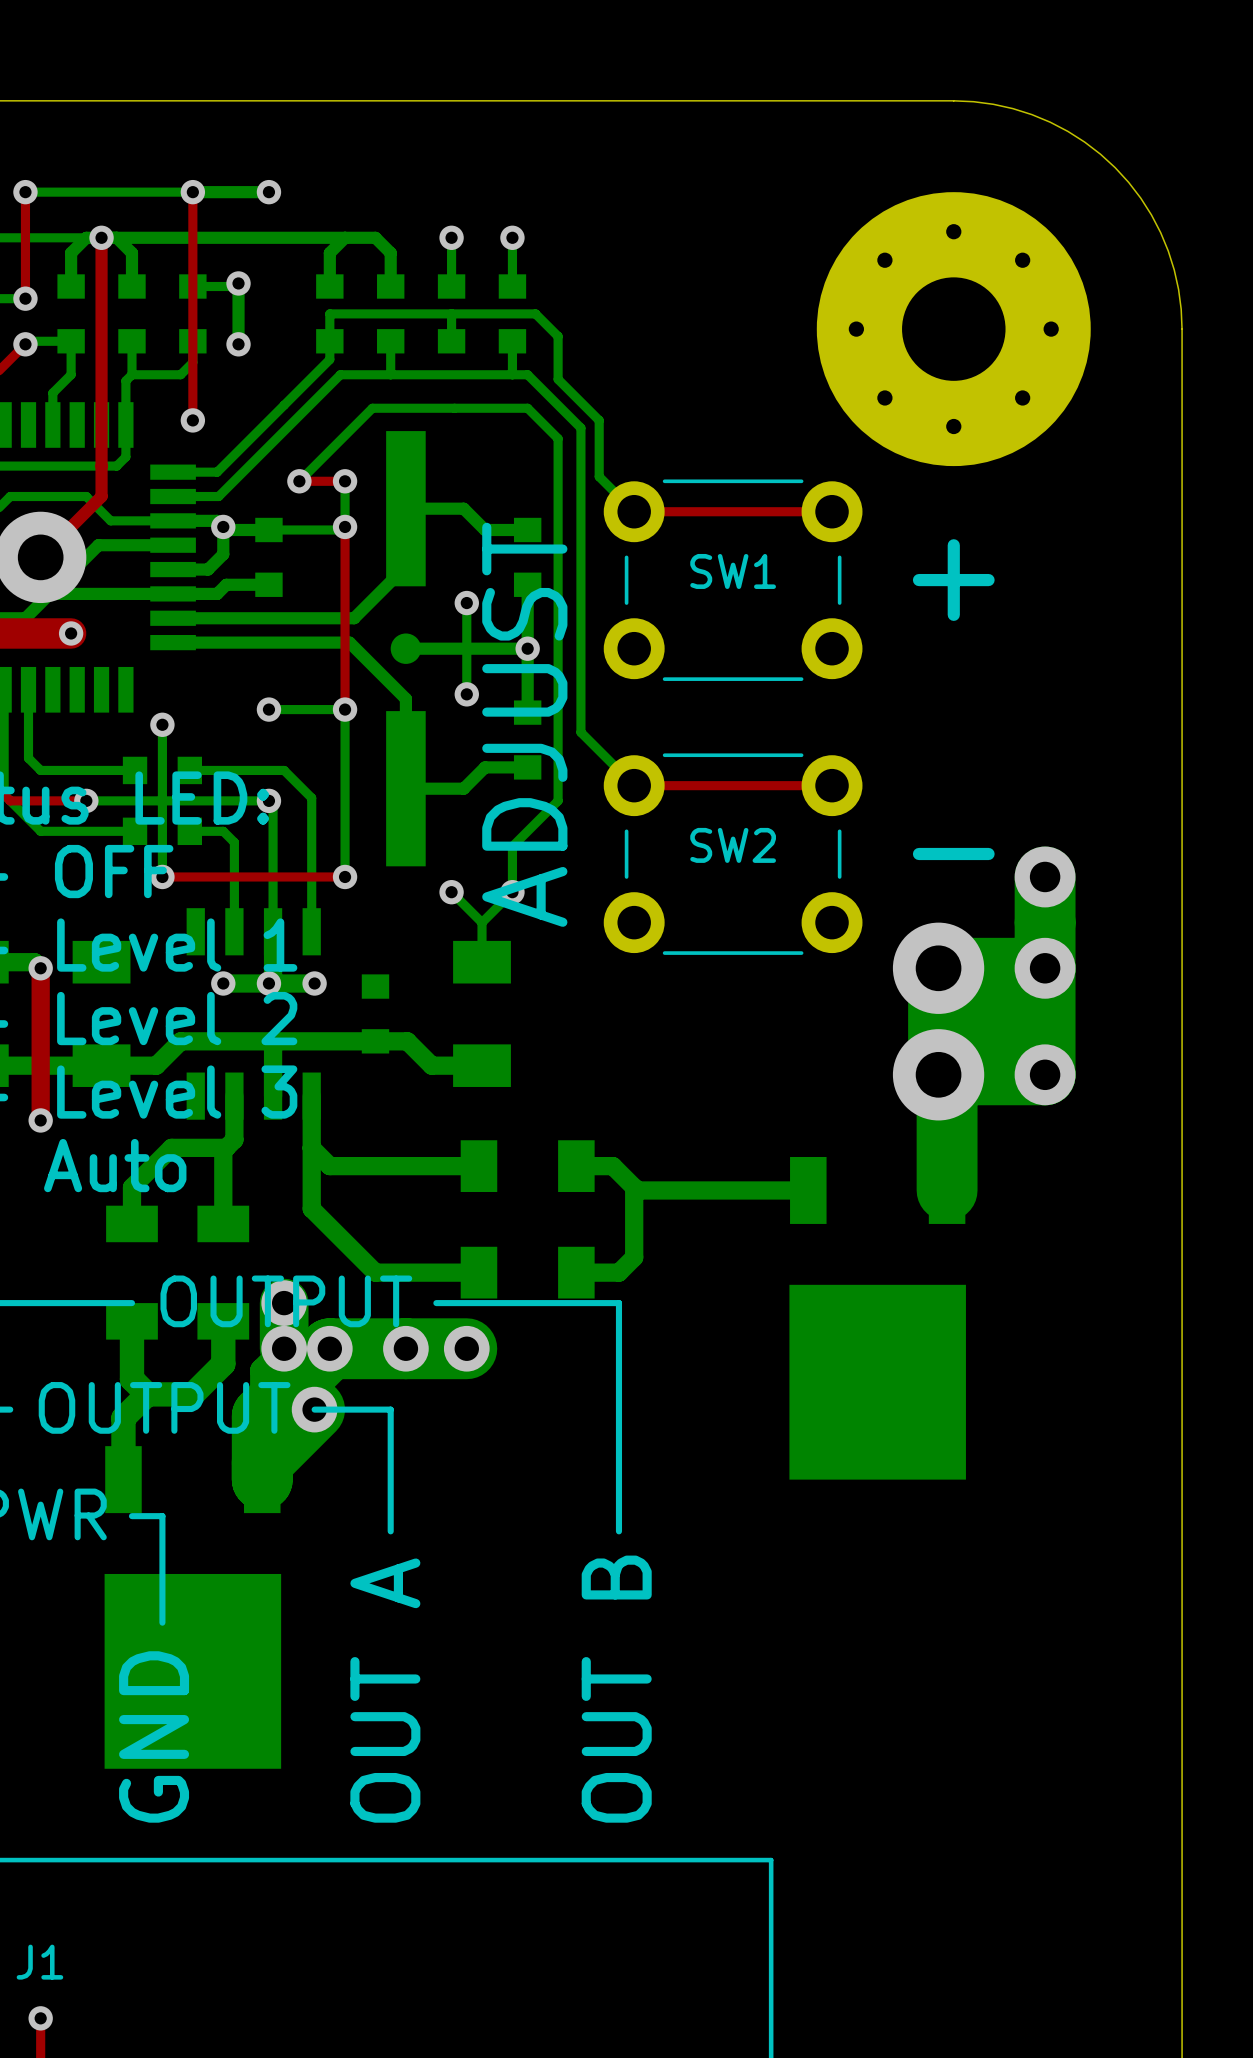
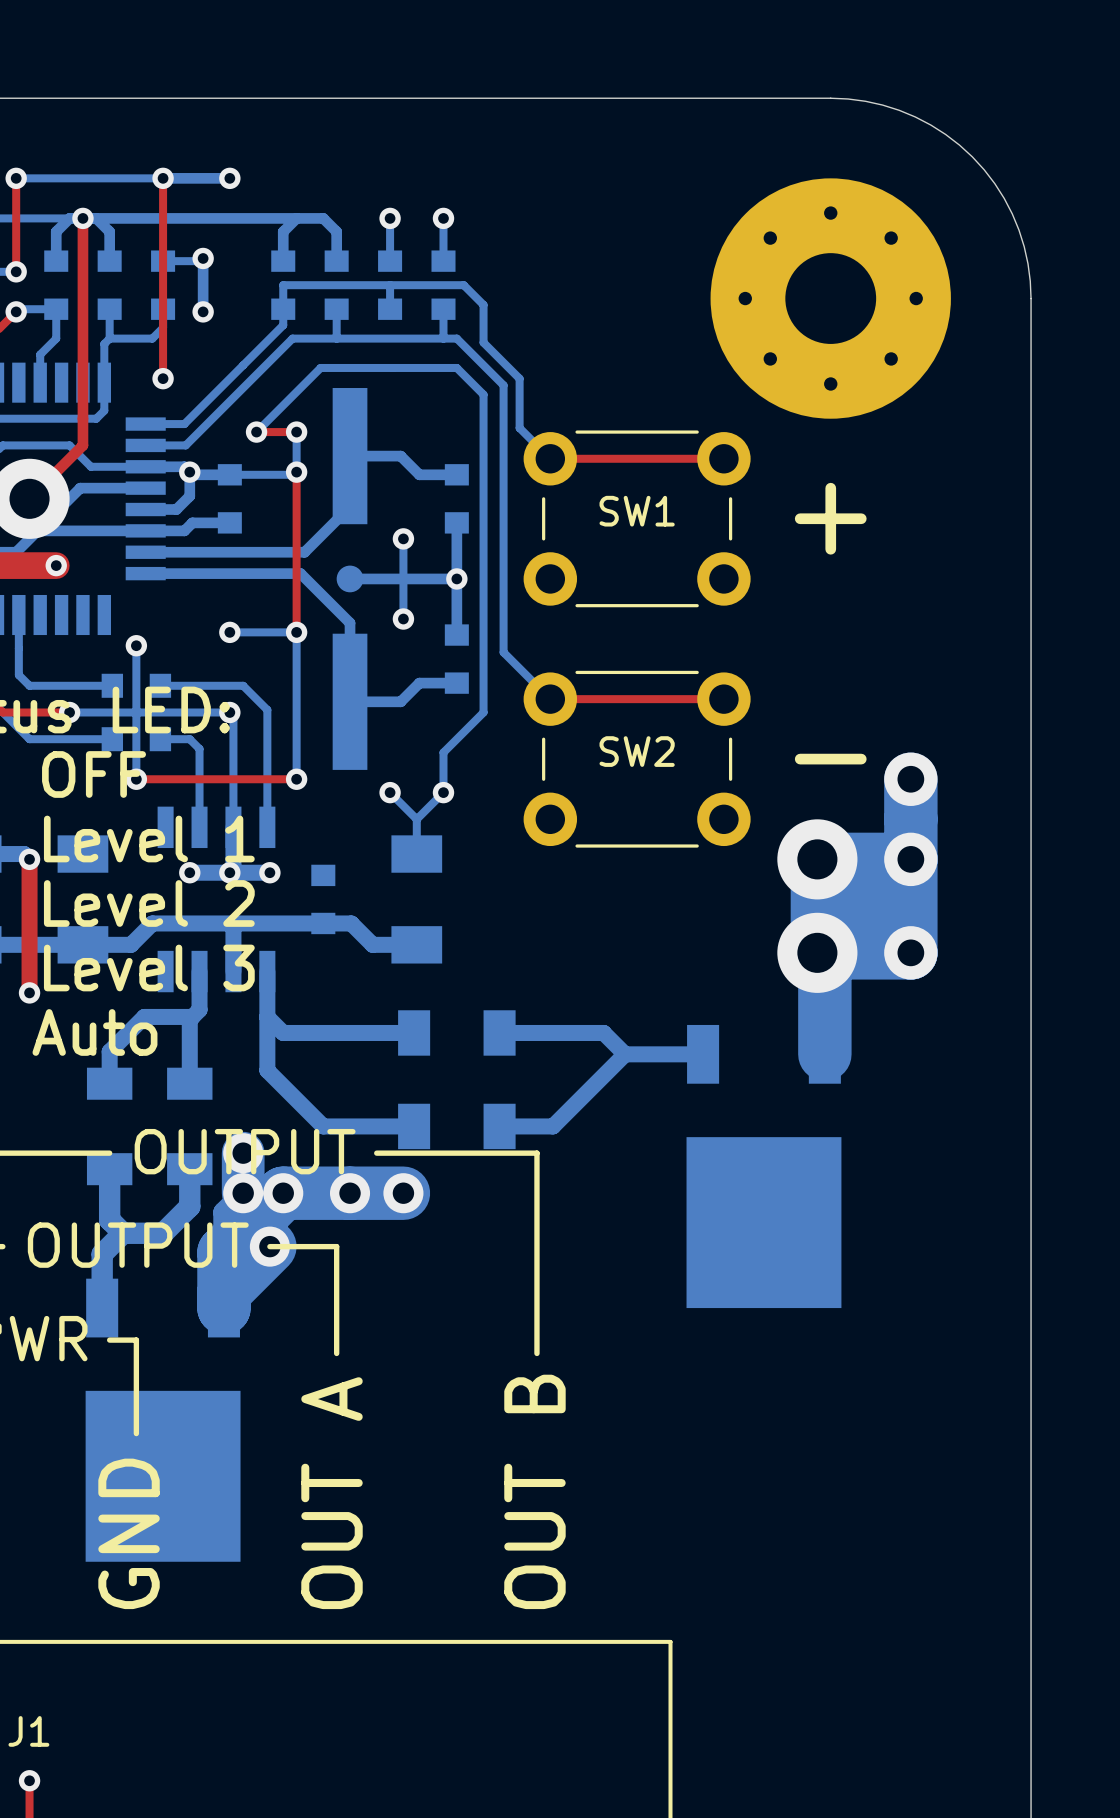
text: ADJUST (524, 724) -> none
bottom track: (612, 1166) (637, 1190) (719, 1190) -> none
bottom track: (634, 1187) (634, 1257) (618, 1272) -> (531, 1032) (603, 1032) (625, 1054) (552, 1126) (536, 1126)

